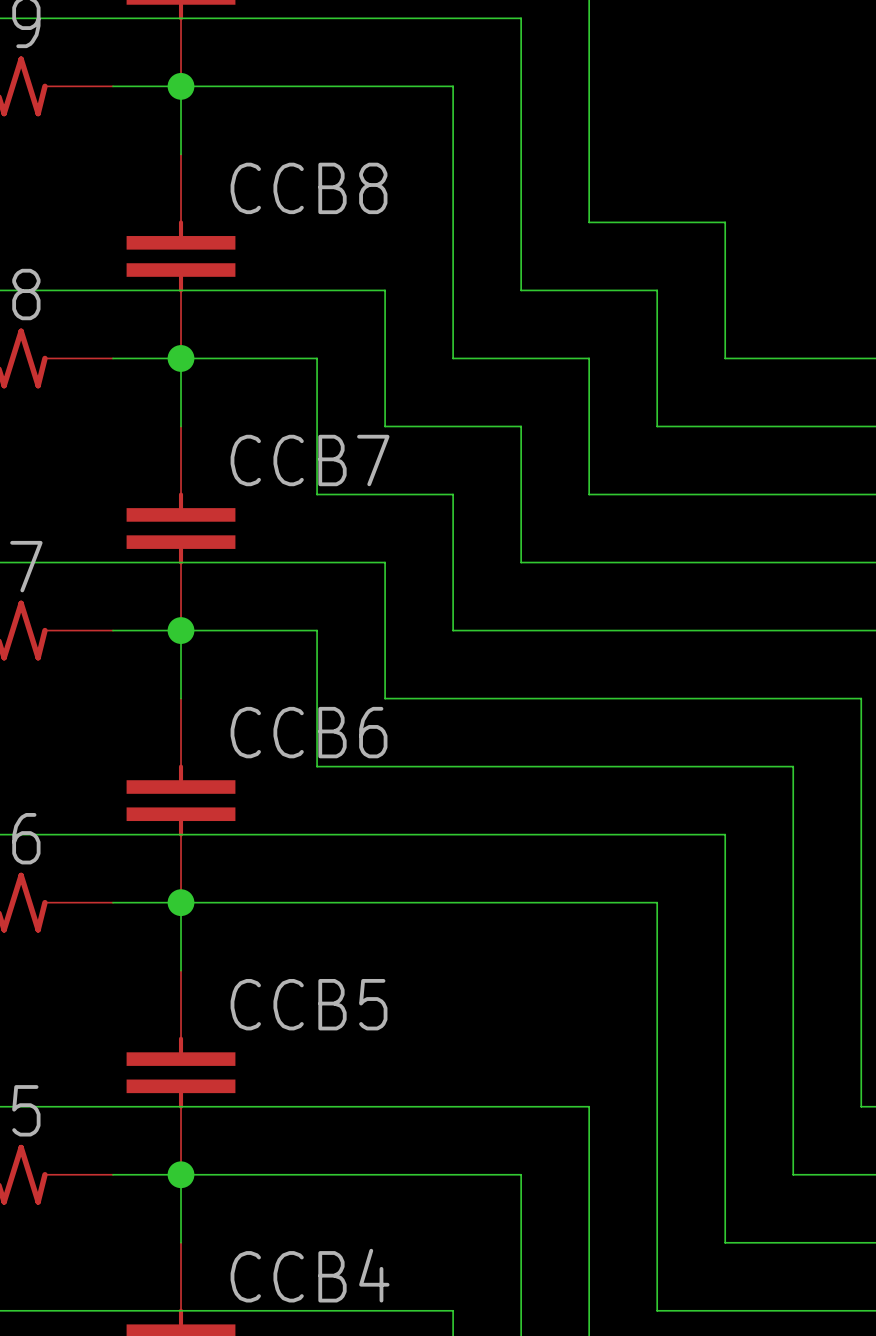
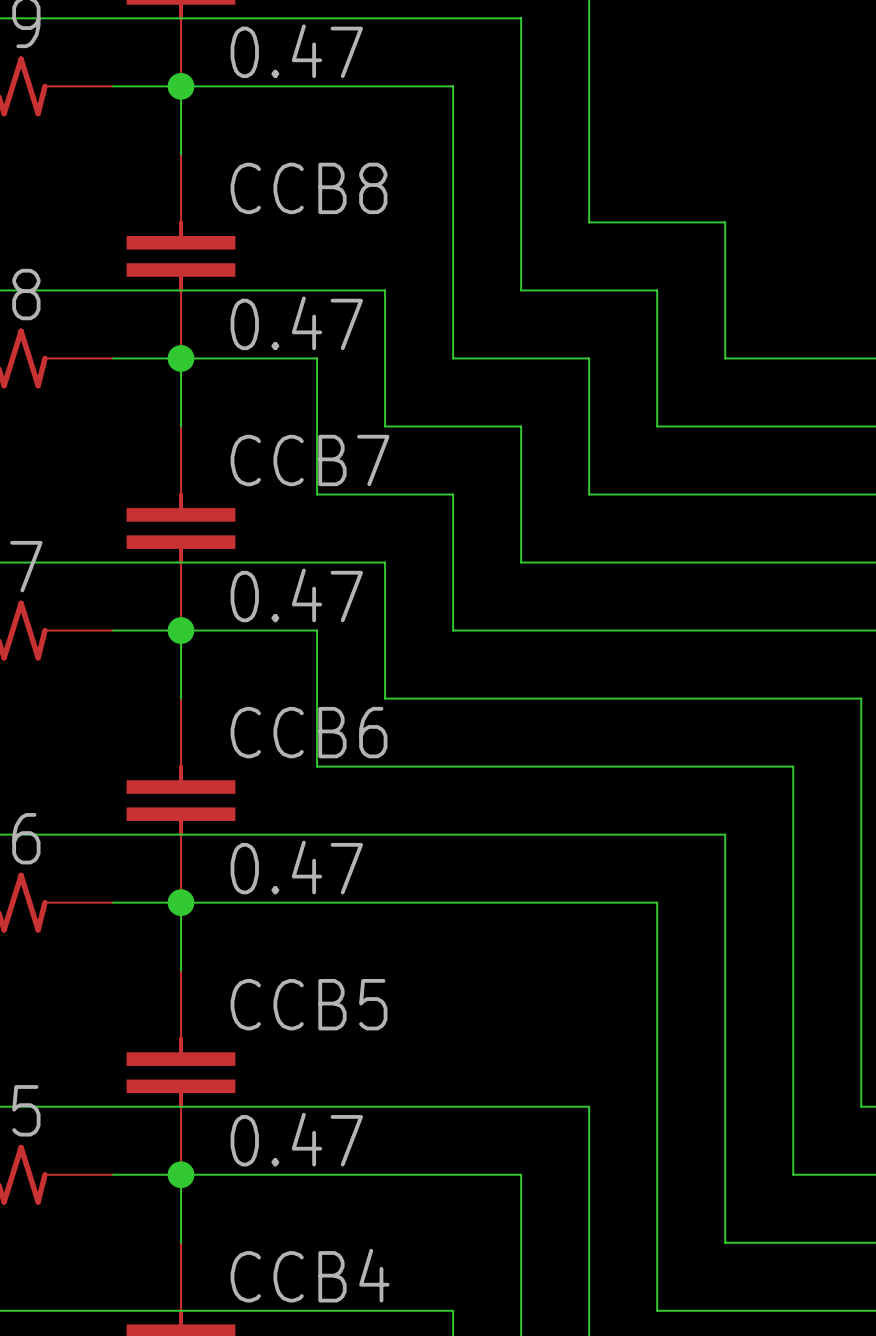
part value: none -> 0.47 (296, 51)
CCB8 value: none -> 0.47 (296, 323)
CCB7 value: none -> 0.47 (296, 595)
CCB6 value: none -> 0.47 (296, 867)
CCB5 value: none -> 0.47 (296, 1139)

